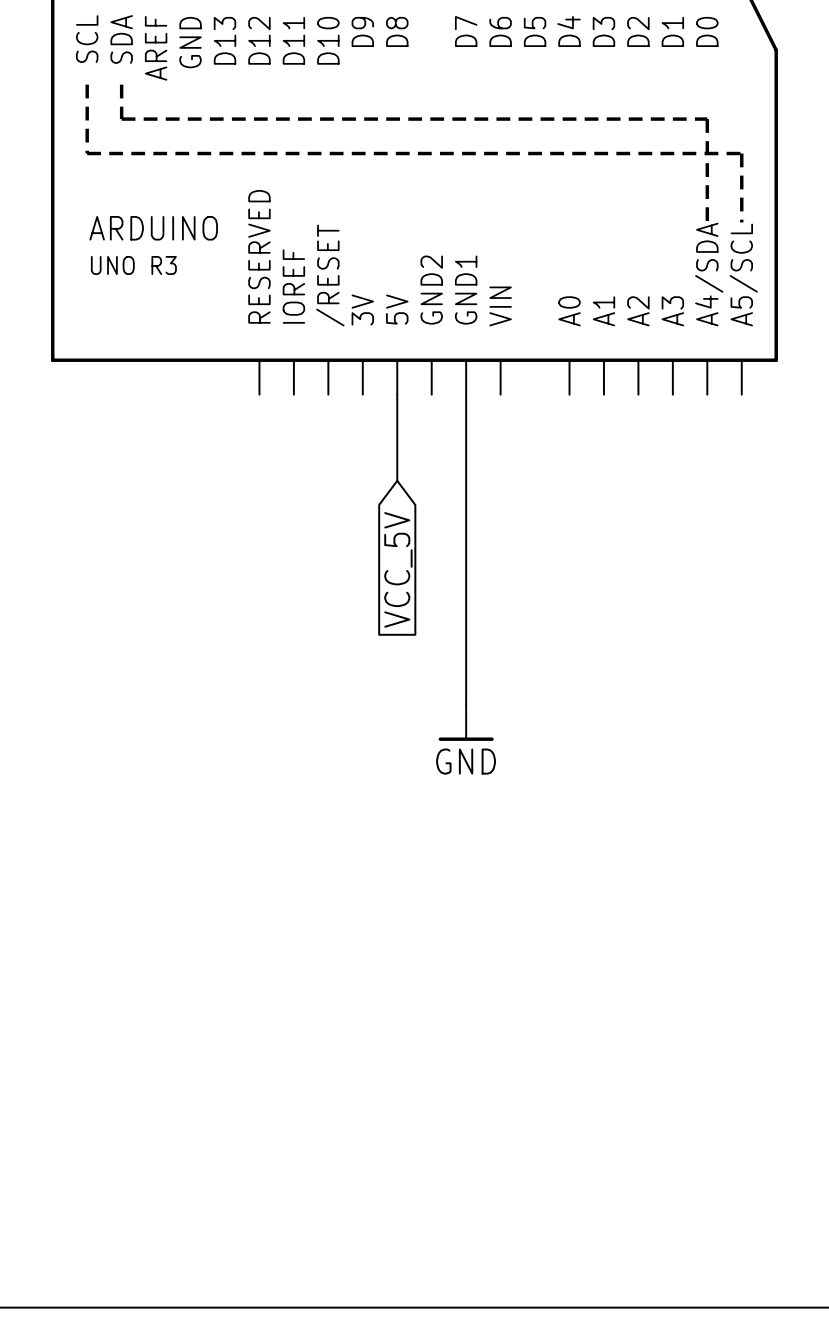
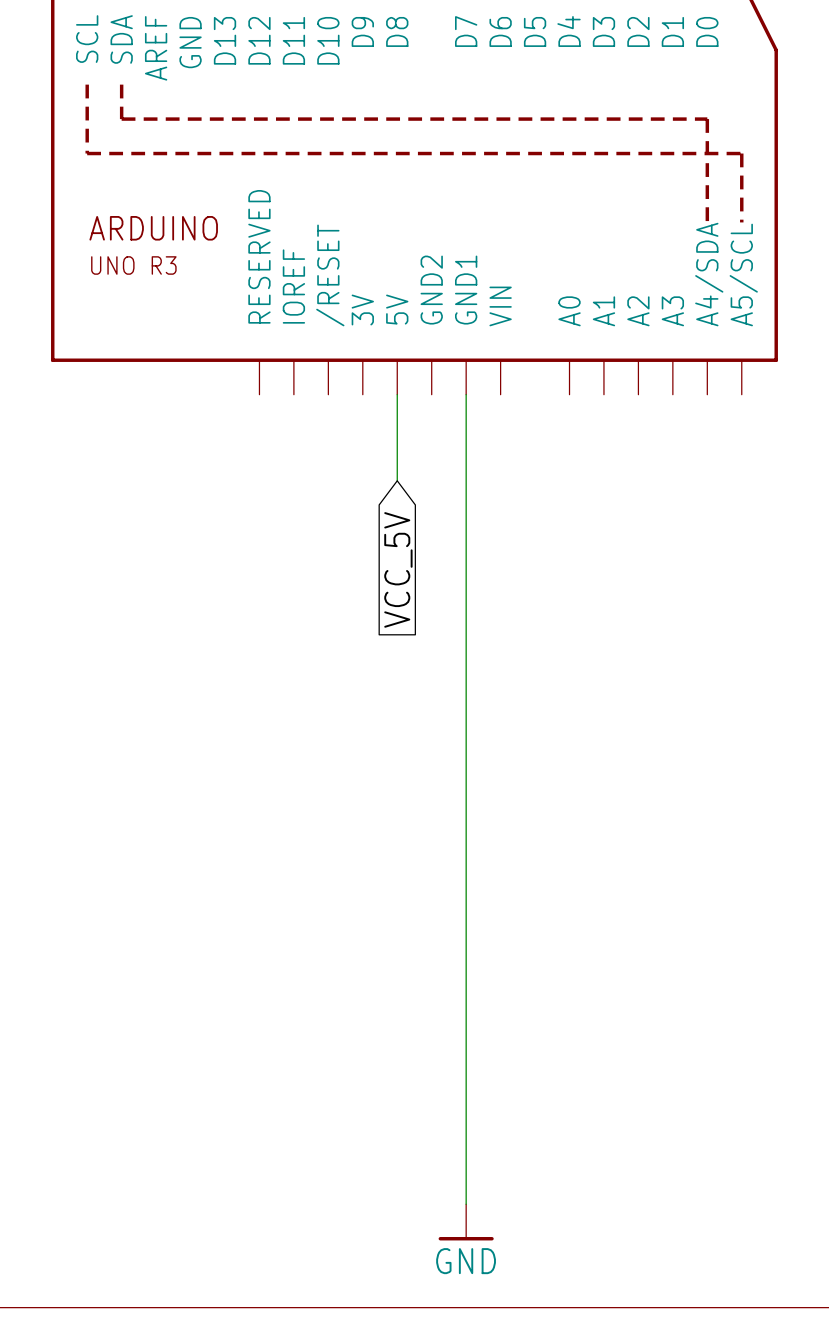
wire: none -> (466, 704) (466, 1204)
power symbol: GND (466, 722) -> none
power symbol: none -> GND (466, 1222)

